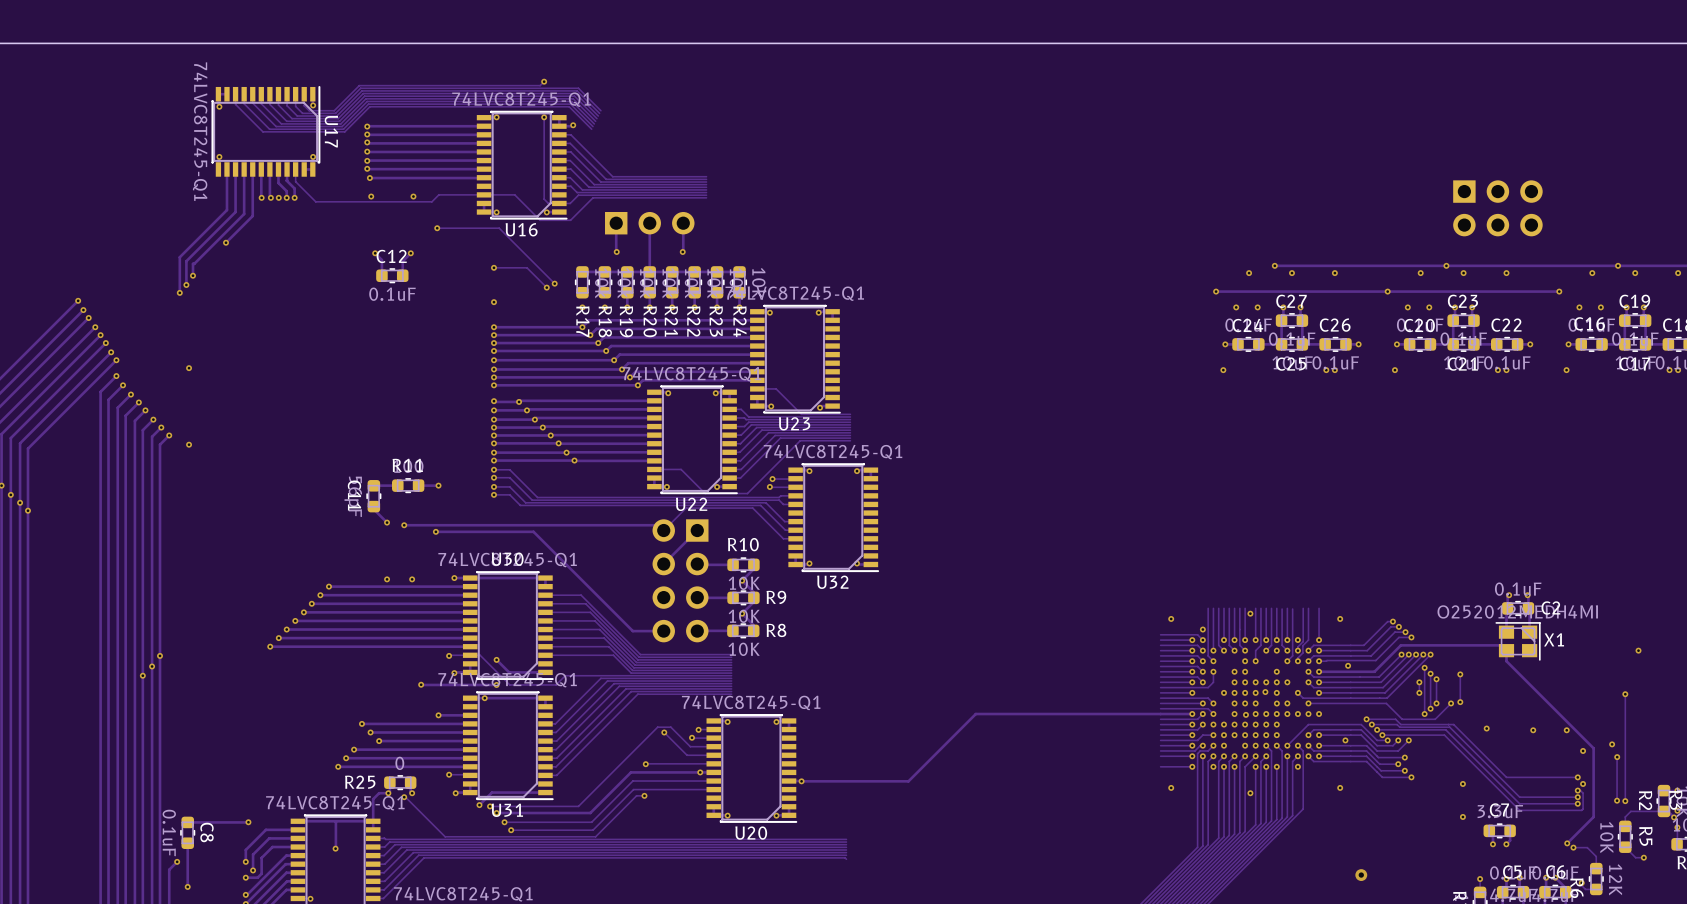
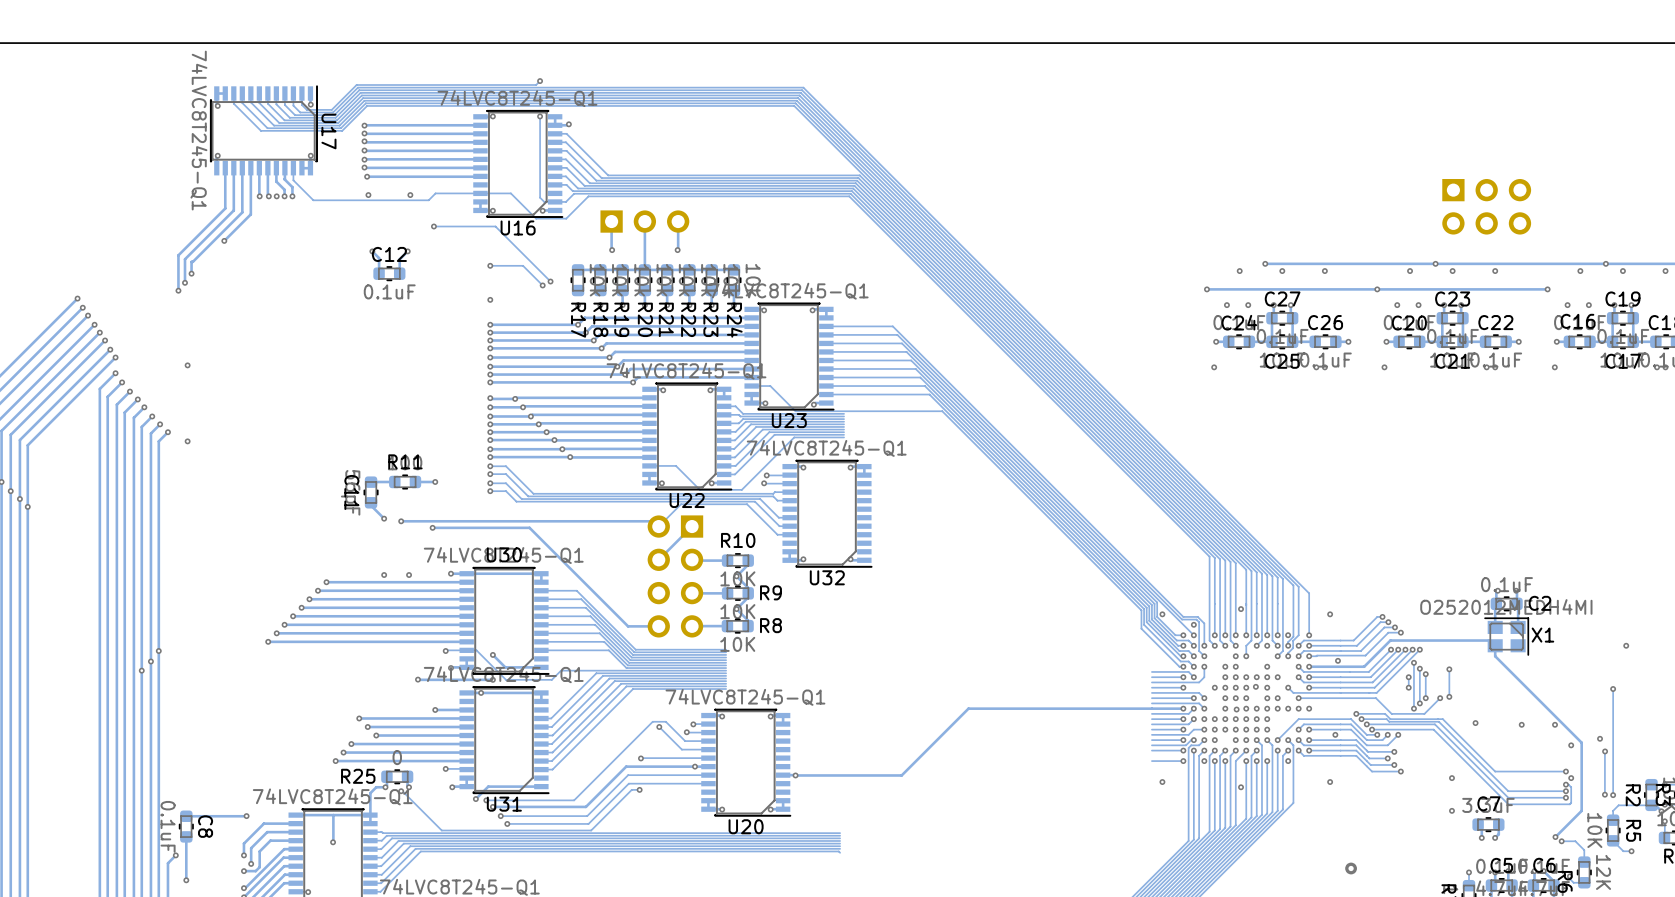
track: (578, 88) (600, 110) -> (574, 87) (803, 87) (1309, 593) (1309, 603)
track: (577, 90) (599, 113) -> (572, 90) (802, 90) (1298, 586) (1298, 603)
track: (575, 93) (598, 116) -> (571, 92) (800, 92) (1293, 585) (1293, 603)
track: (574, 96) (596, 118) -> (570, 95) (799, 95) (1282, 578) (1282, 604)
track: (573, 98) (595, 121) -> (568, 98) (798, 98) (1277, 577) (1277, 603)
track: (571, 101) (594, 123) -> (567, 100) (796, 100) (1272, 576) (1272, 604)
track: (570, 104) (592, 126) -> (566, 103) (795, 103) (1267, 575) (1267, 603)
track: (569, 106) (591, 129) -> (564, 105) (794, 105) (1261, 573) (1261, 603)
track: none -> (701, 175) (859, 175) (1256, 572) (1256, 603)
track: none -> (701, 178) (858, 178) (1251, 571) (1251, 603)
track: none -> (701, 180) (857, 180) (1246, 569) (1246, 603)
track: none -> (701, 183) (855, 183) (1235, 563) (1235, 603)
track: none -> (701, 185) (854, 185) (1230, 561) (1230, 603)
track: none -> (701, 188) (853, 188) (1225, 560) (1225, 603)
track: none -> (701, 191) (851, 191) (1220, 559) (1220, 603)
track: none -> (701, 193) (850, 193) (1214, 557) (1214, 603)
track: none -> (701, 196) (849, 196) (1209, 556) (1209, 603)
track: (1208, 608) (1208, 626) -> (826, 334) (897, 334) (1182, 619) (1196, 619) (1199, 622)
track: (1213, 608) (1213, 628) -> (826, 326) (892, 326) (1183, 616) (1197, 616) (1204, 623)
track: (1197, 634) (1160, 634) -> (1188, 630) (902, 343) (826, 343)
track: (1184, 640) (1160, 640) -> (1175, 635) (1157, 616) (1157, 602) (906, 351) (826, 351)
track: (1185, 645) (1160, 645) -> (1176, 640) (1154, 618) (1154, 603) (911, 360) (826, 360)
track: (1187, 650) (1160, 650) -> (1178, 645) (1151, 619) (1151, 605) (915, 368) (826, 368)
track: (1188, 655) (1160, 655) -> (1179, 651) (1149, 620) (1149, 606) (920, 377) (826, 377)
track: (1189, 661) (1160, 661) -> (1180, 656) (1146, 622) (1146, 607) (924, 386) (826, 386)
track: (1189, 666) (1160, 666) -> (1180, 661) (1144, 624) (1144, 609) (929, 394) (826, 394)
track: (1188, 671) (1160, 671) -> (1179, 666) (1141, 628) (1141, 610) (942, 411) (844, 411)

